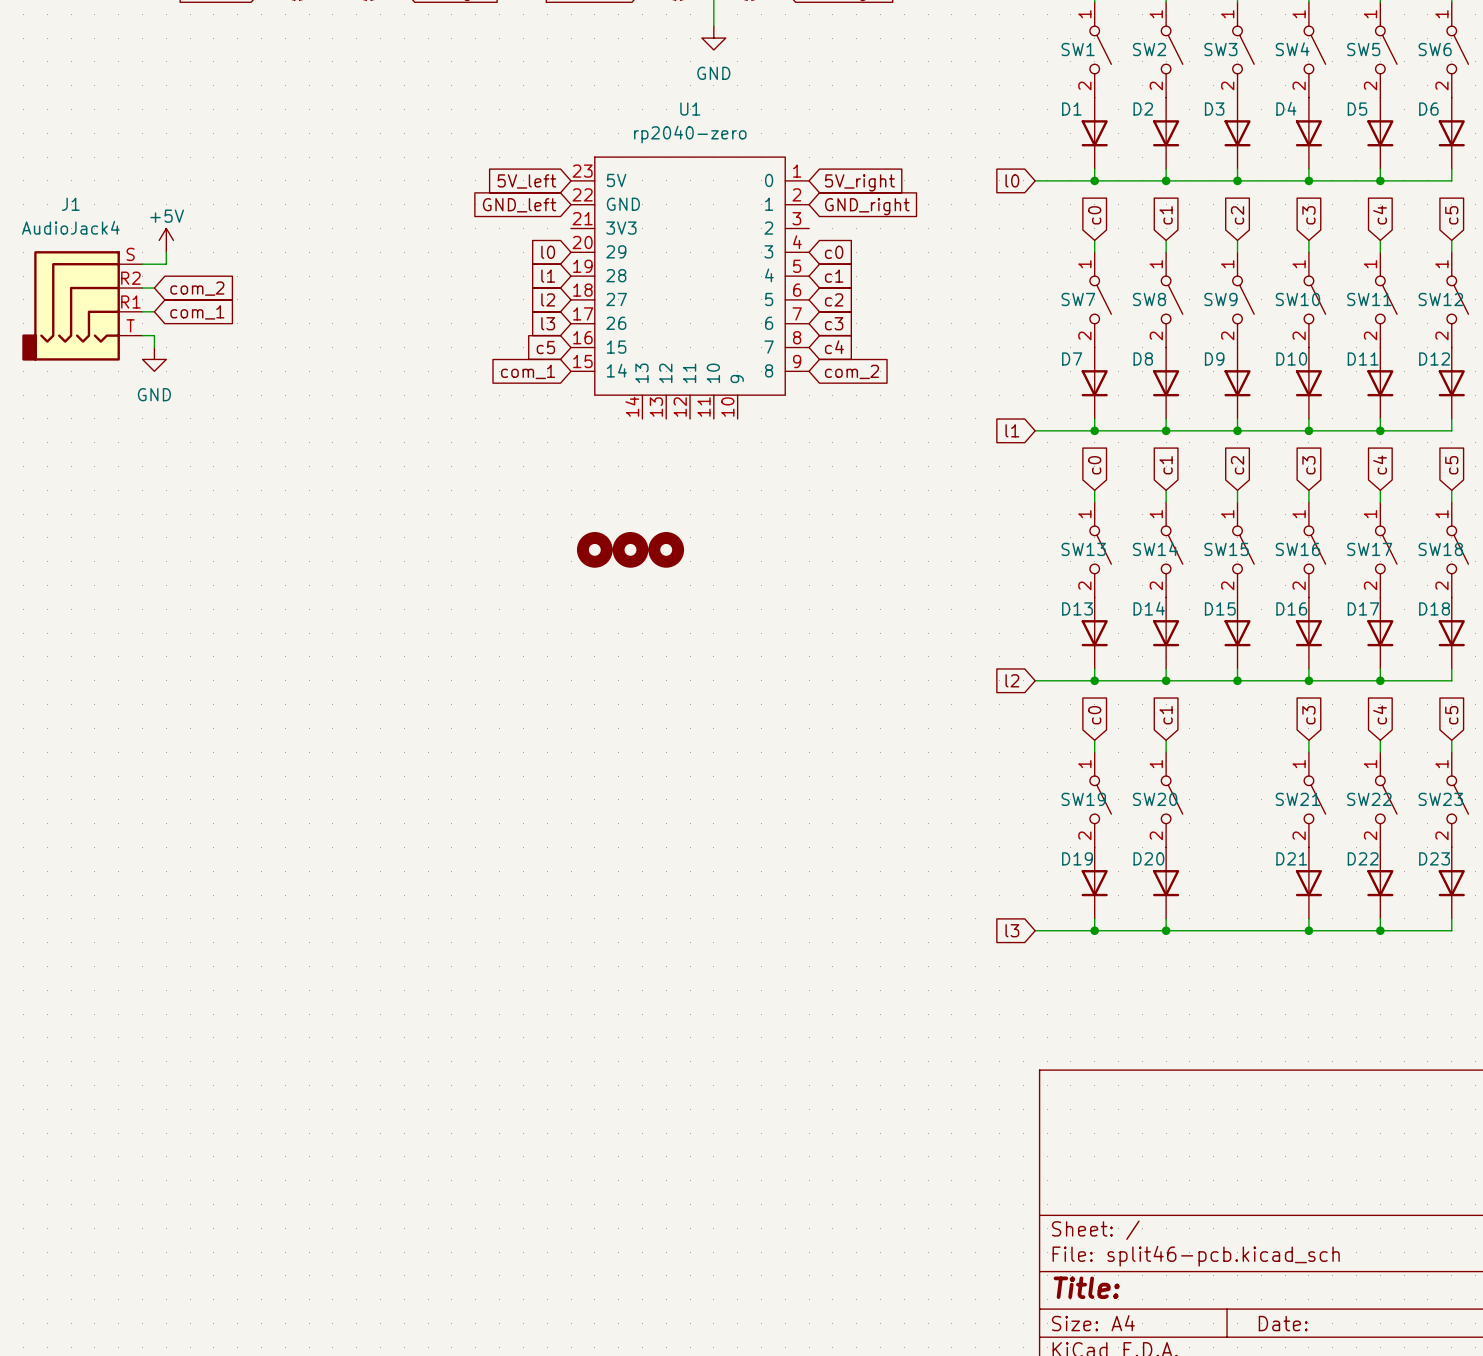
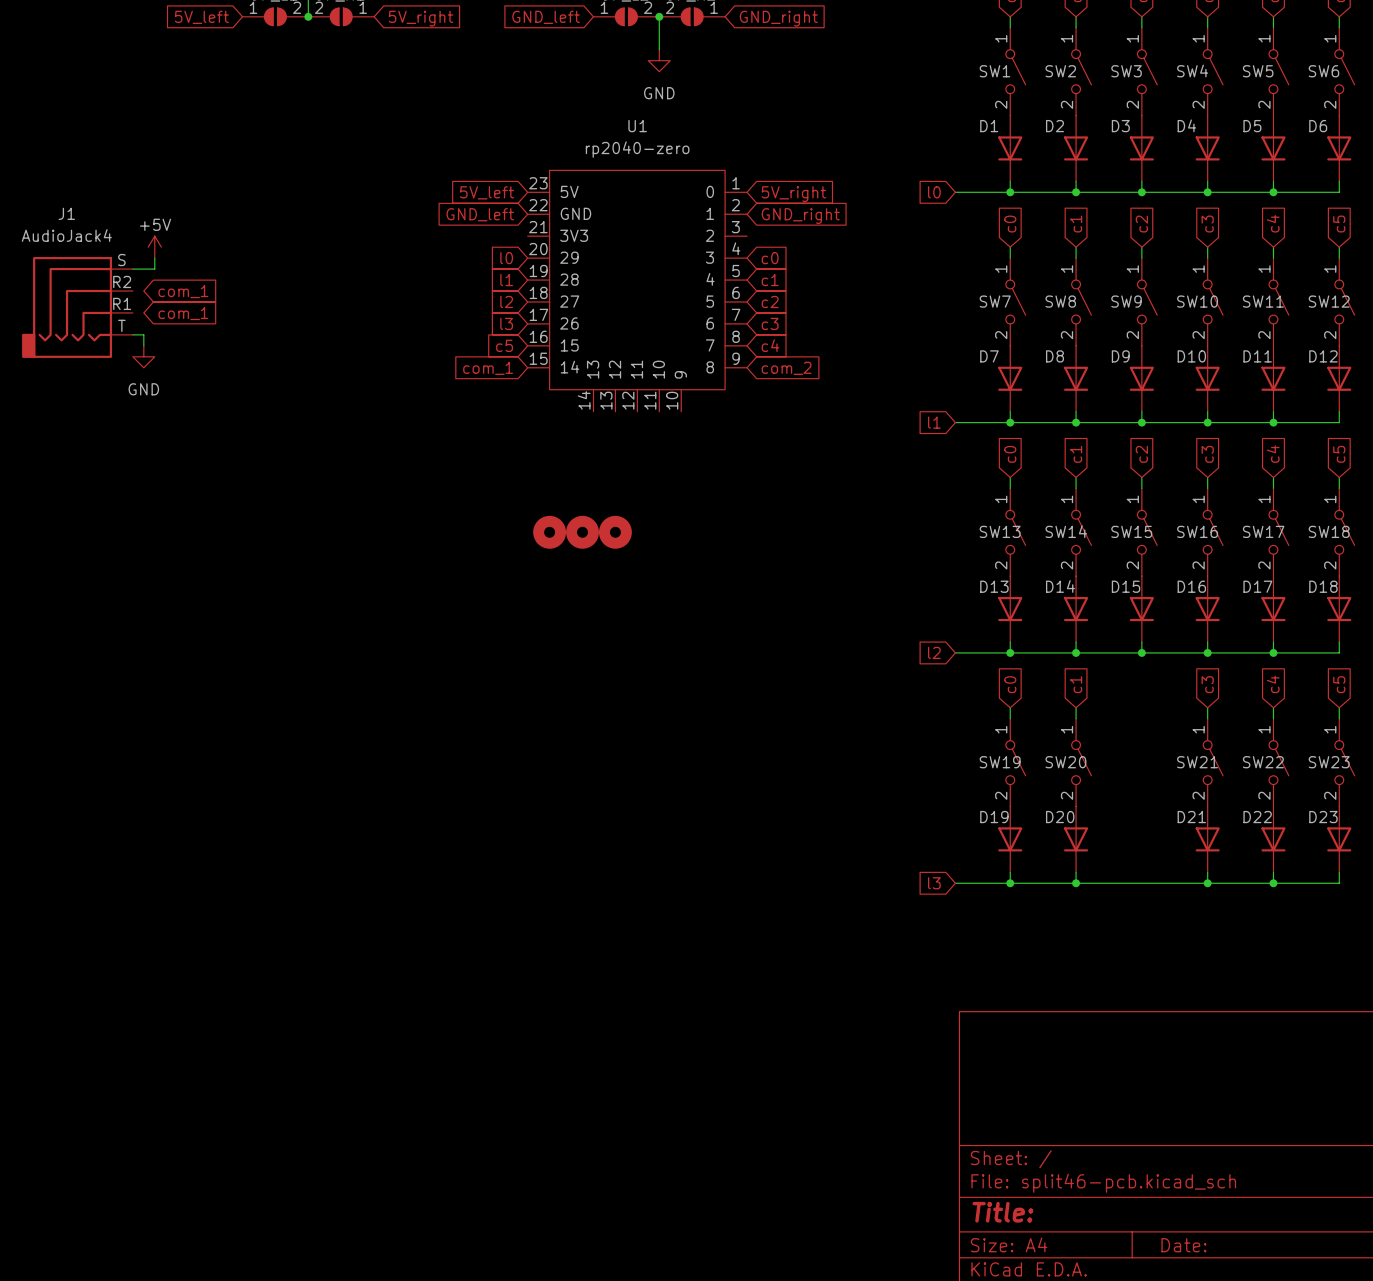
wire: (142, 288) (154, 288) -> none
global label: com_2 (197, 288) -> com_1 (183, 291)
wire: (142, 311) (154, 311) -> none

